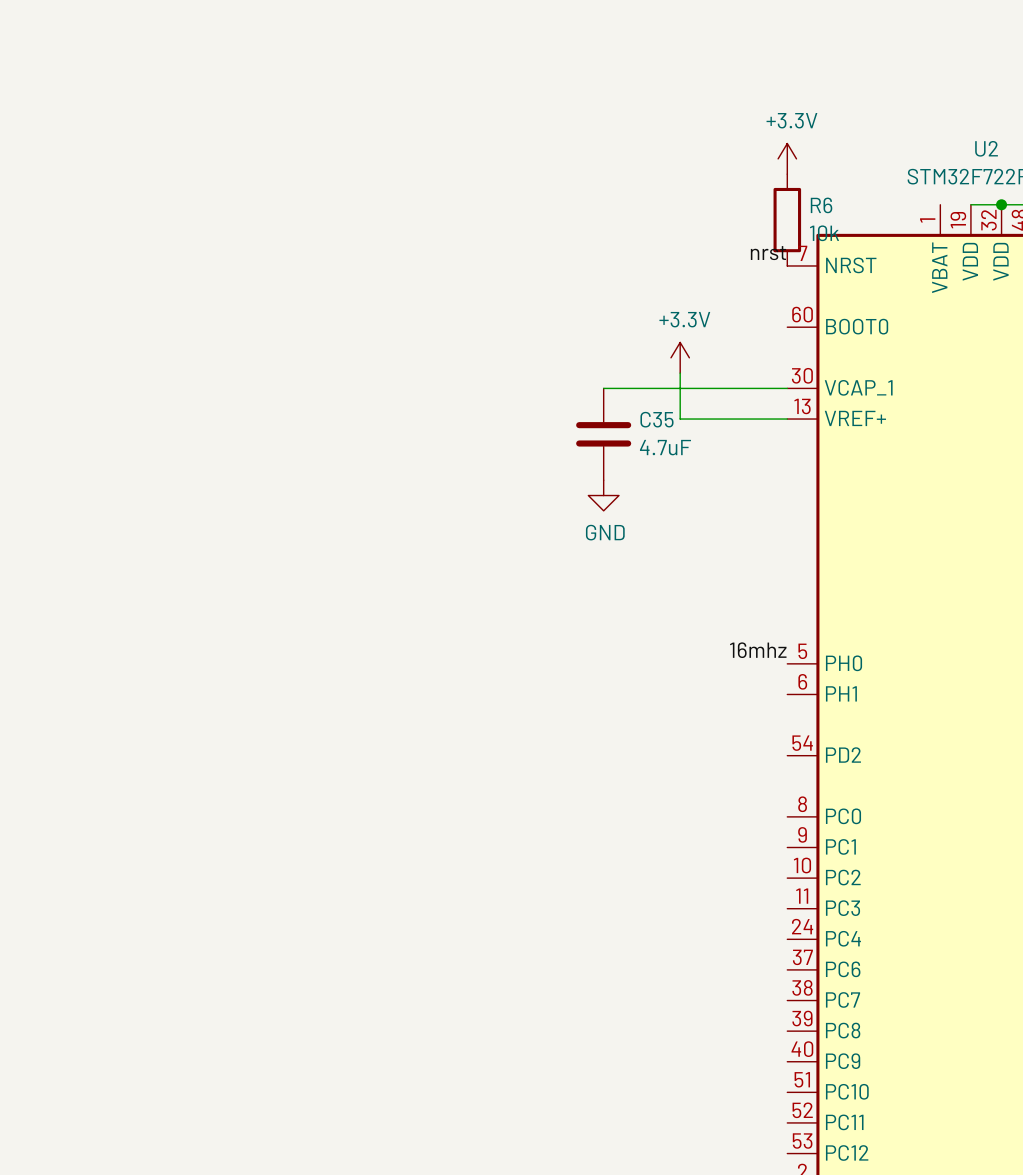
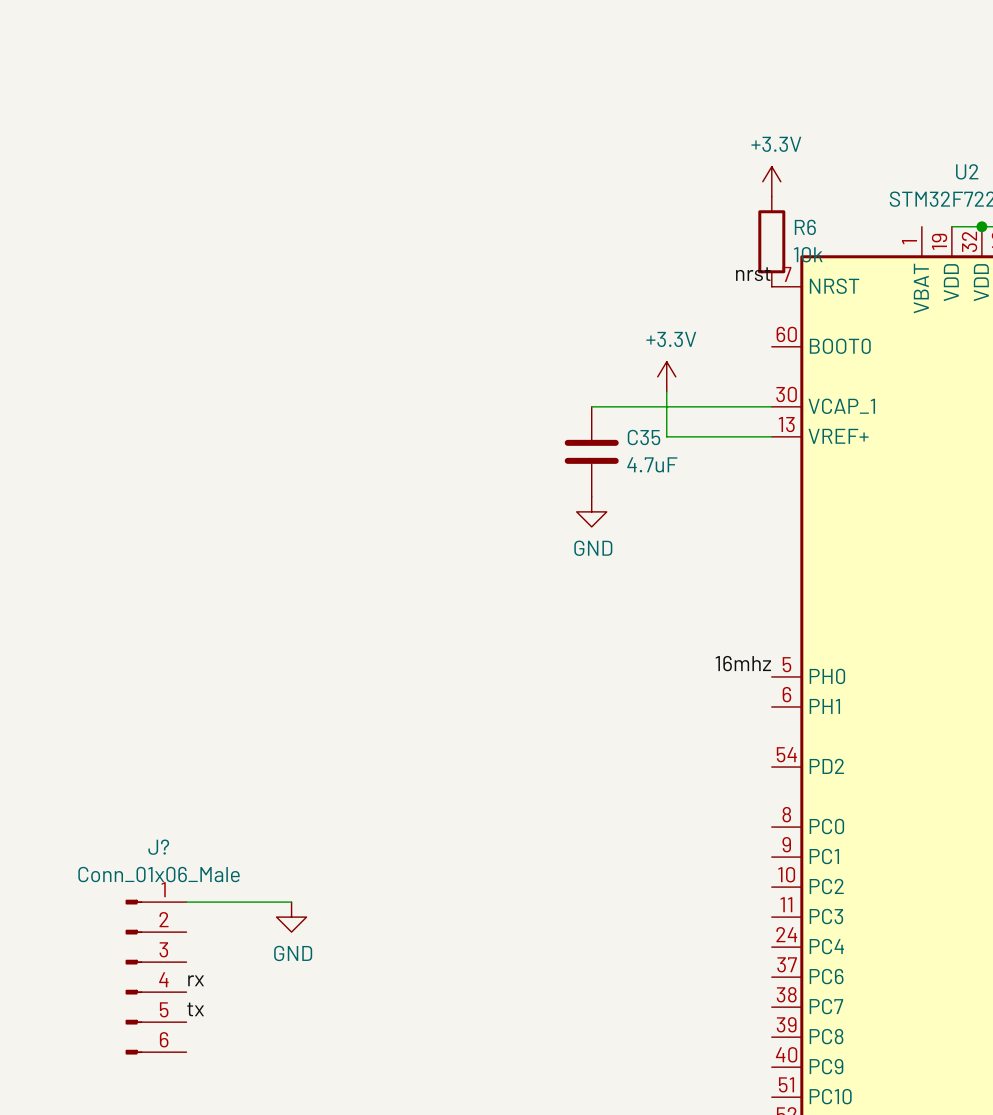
wire: none -> (186, 902) (291, 902)
power symbol: none -> GND (291, 917)
J?: none -> Conn_01x06_Male (156, 977)
label: none -> rx (196, 980)
label: none -> tx (195, 1009)

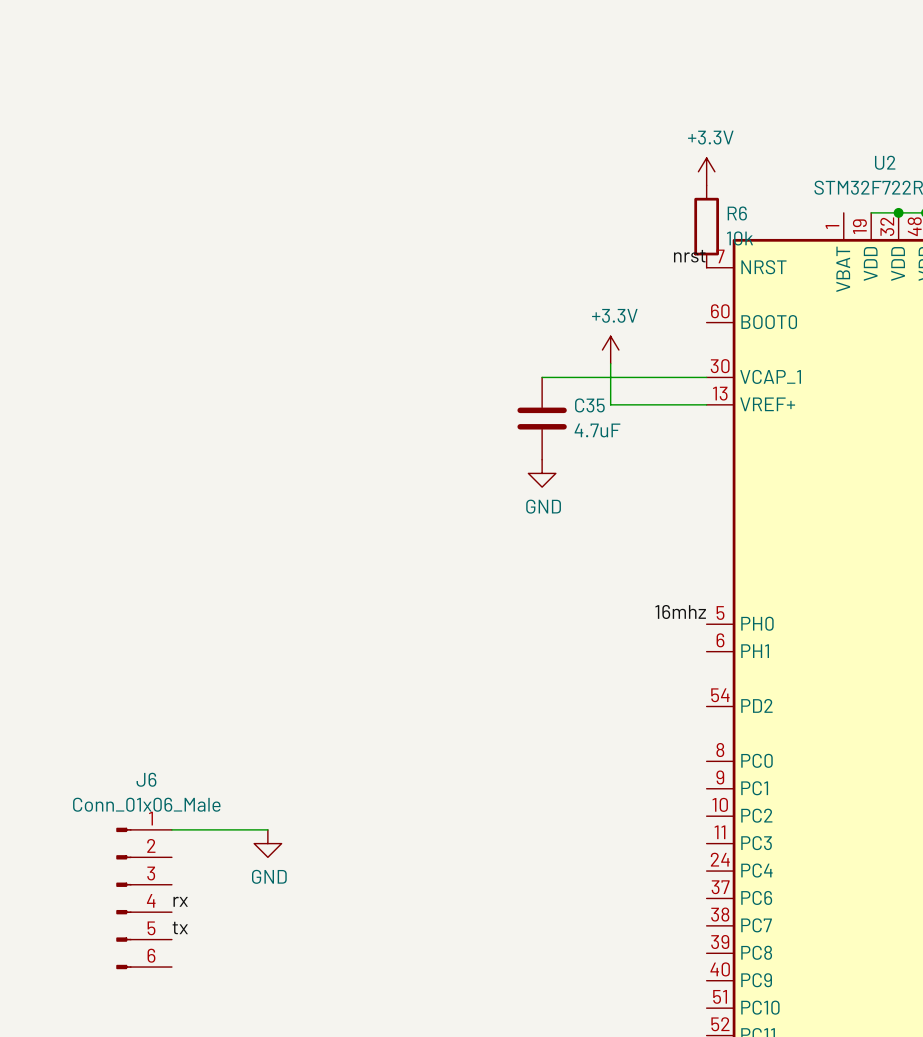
J? name: J? (158, 847) -> J6 (146, 779)

